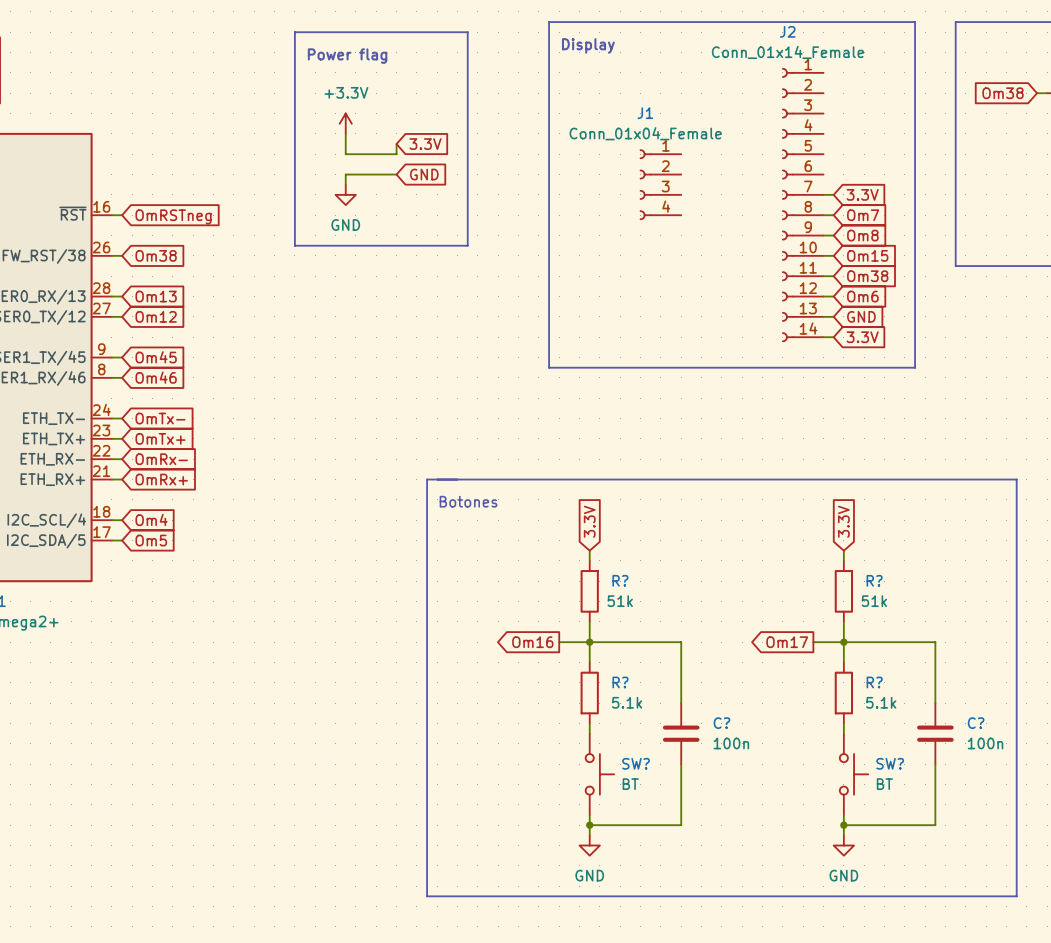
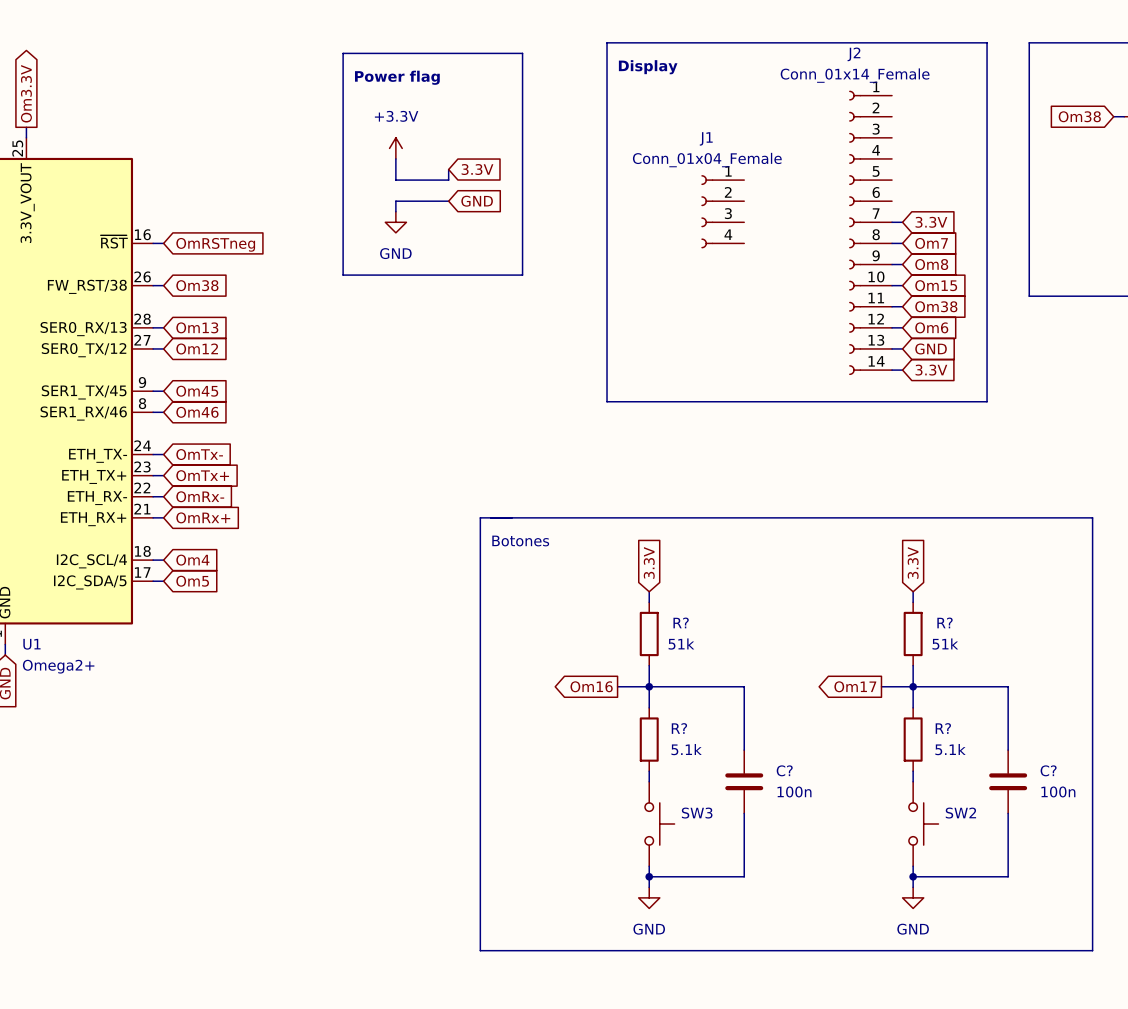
SW? name: SW? (636, 763) -> SW3 (697, 813)
SW? name: SW? (890, 763) -> SW2 (960, 813)
SW? value: BT (630, 784) -> none
SW? value: BT (884, 784) -> none

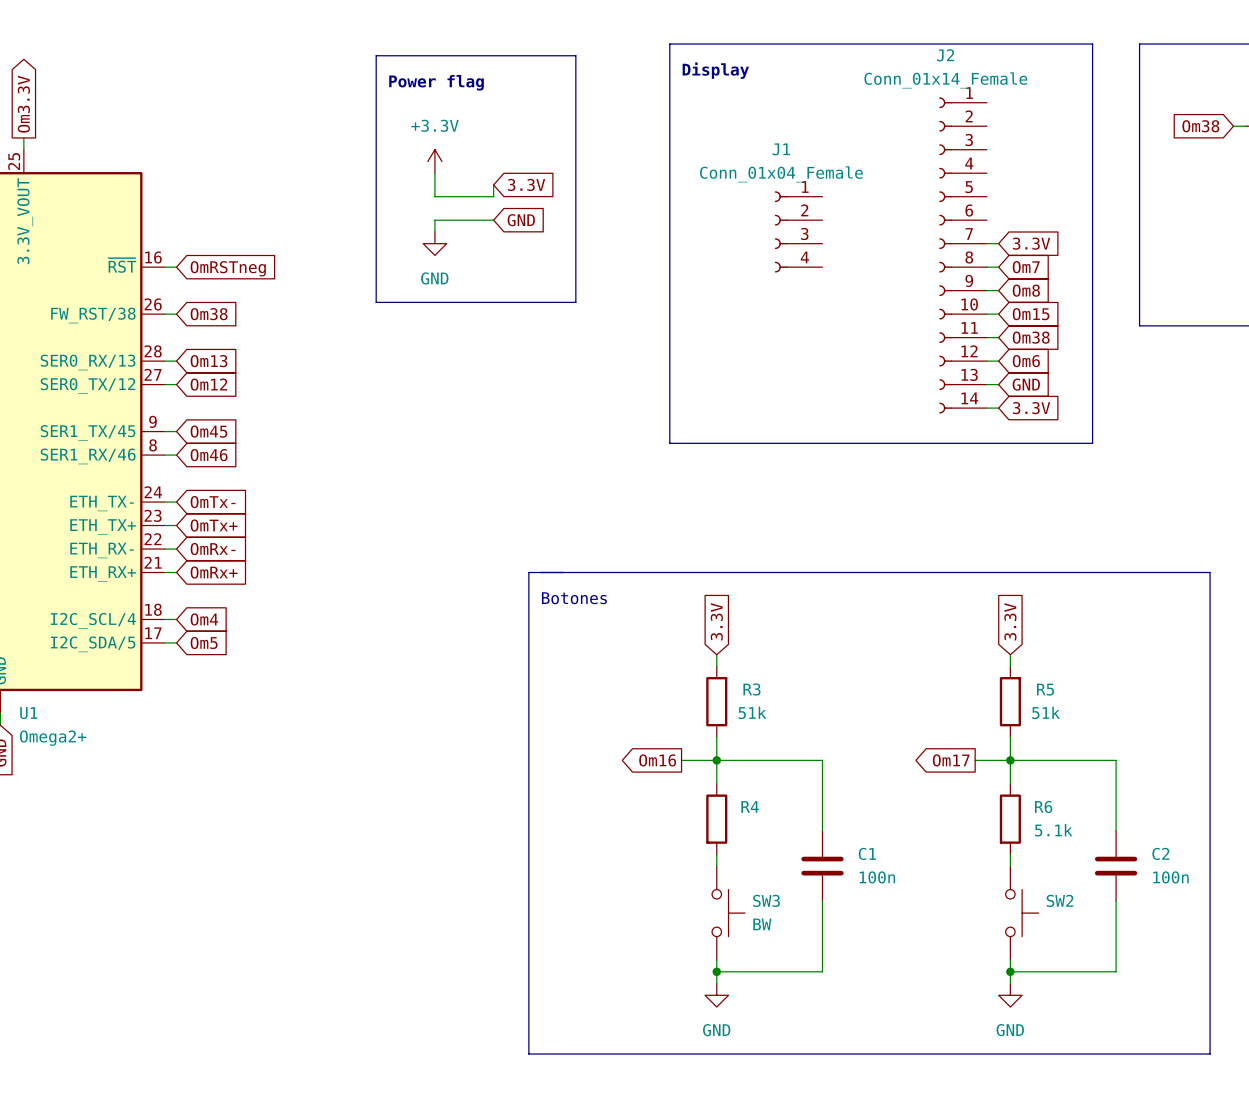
R? name: R? (681, 622) -> R3 (751, 689)
R? name: R? (945, 622) -> R5 (1045, 689)
R? name: R? (679, 728) -> R4 (750, 806)
R? name: R? (943, 728) -> R6 (1043, 806)
R? value: 5.1k (686, 749) -> none
C? name: C? (784, 770) -> C1 (867, 853)
C? name: C? (1048, 770) -> C2 (1160, 853)
SW3 value: none -> BW (762, 924)

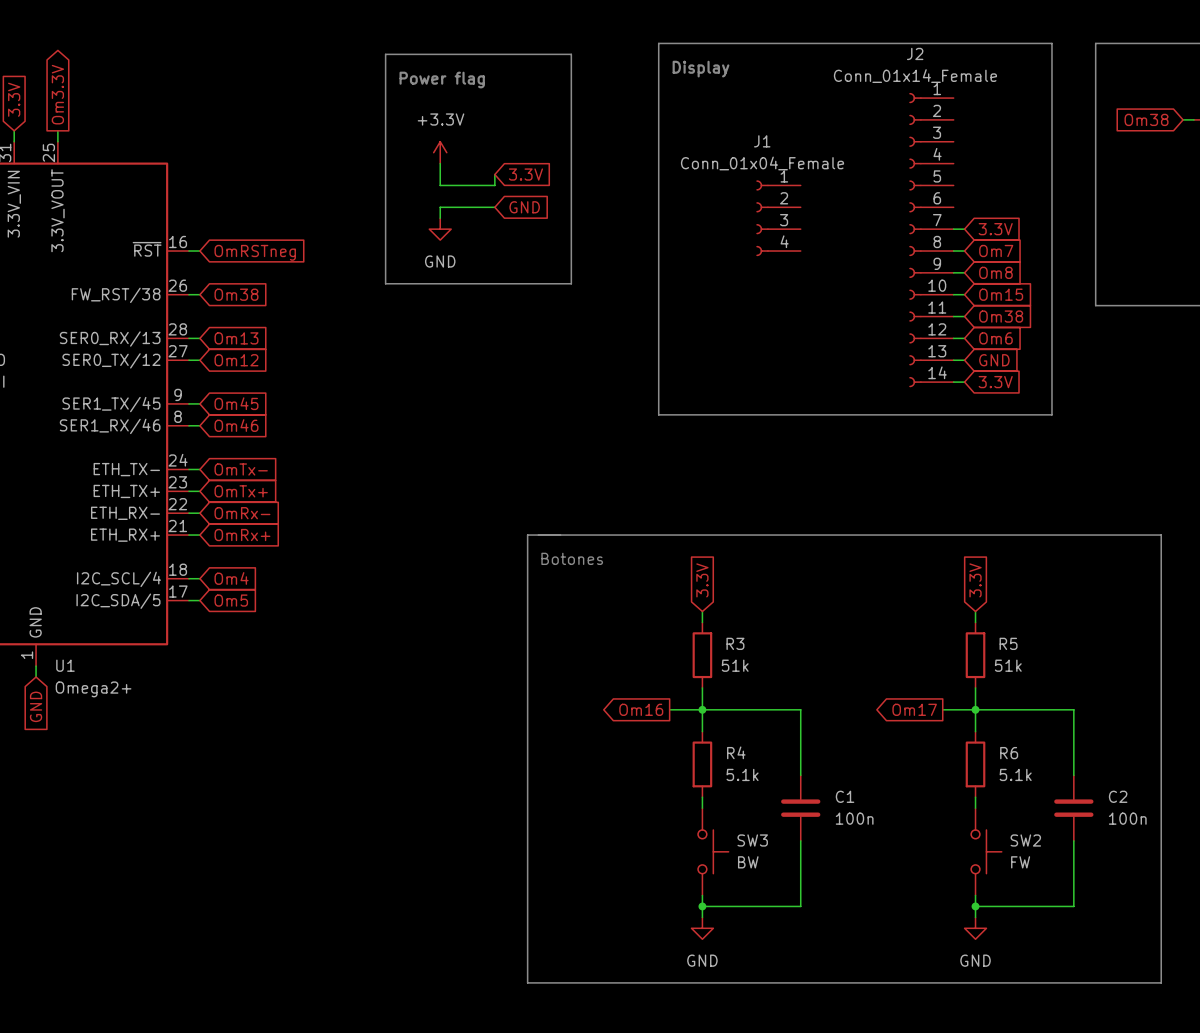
R4 value: none -> 5.1k (742, 774)
SW2 value: none -> FW (1020, 862)

